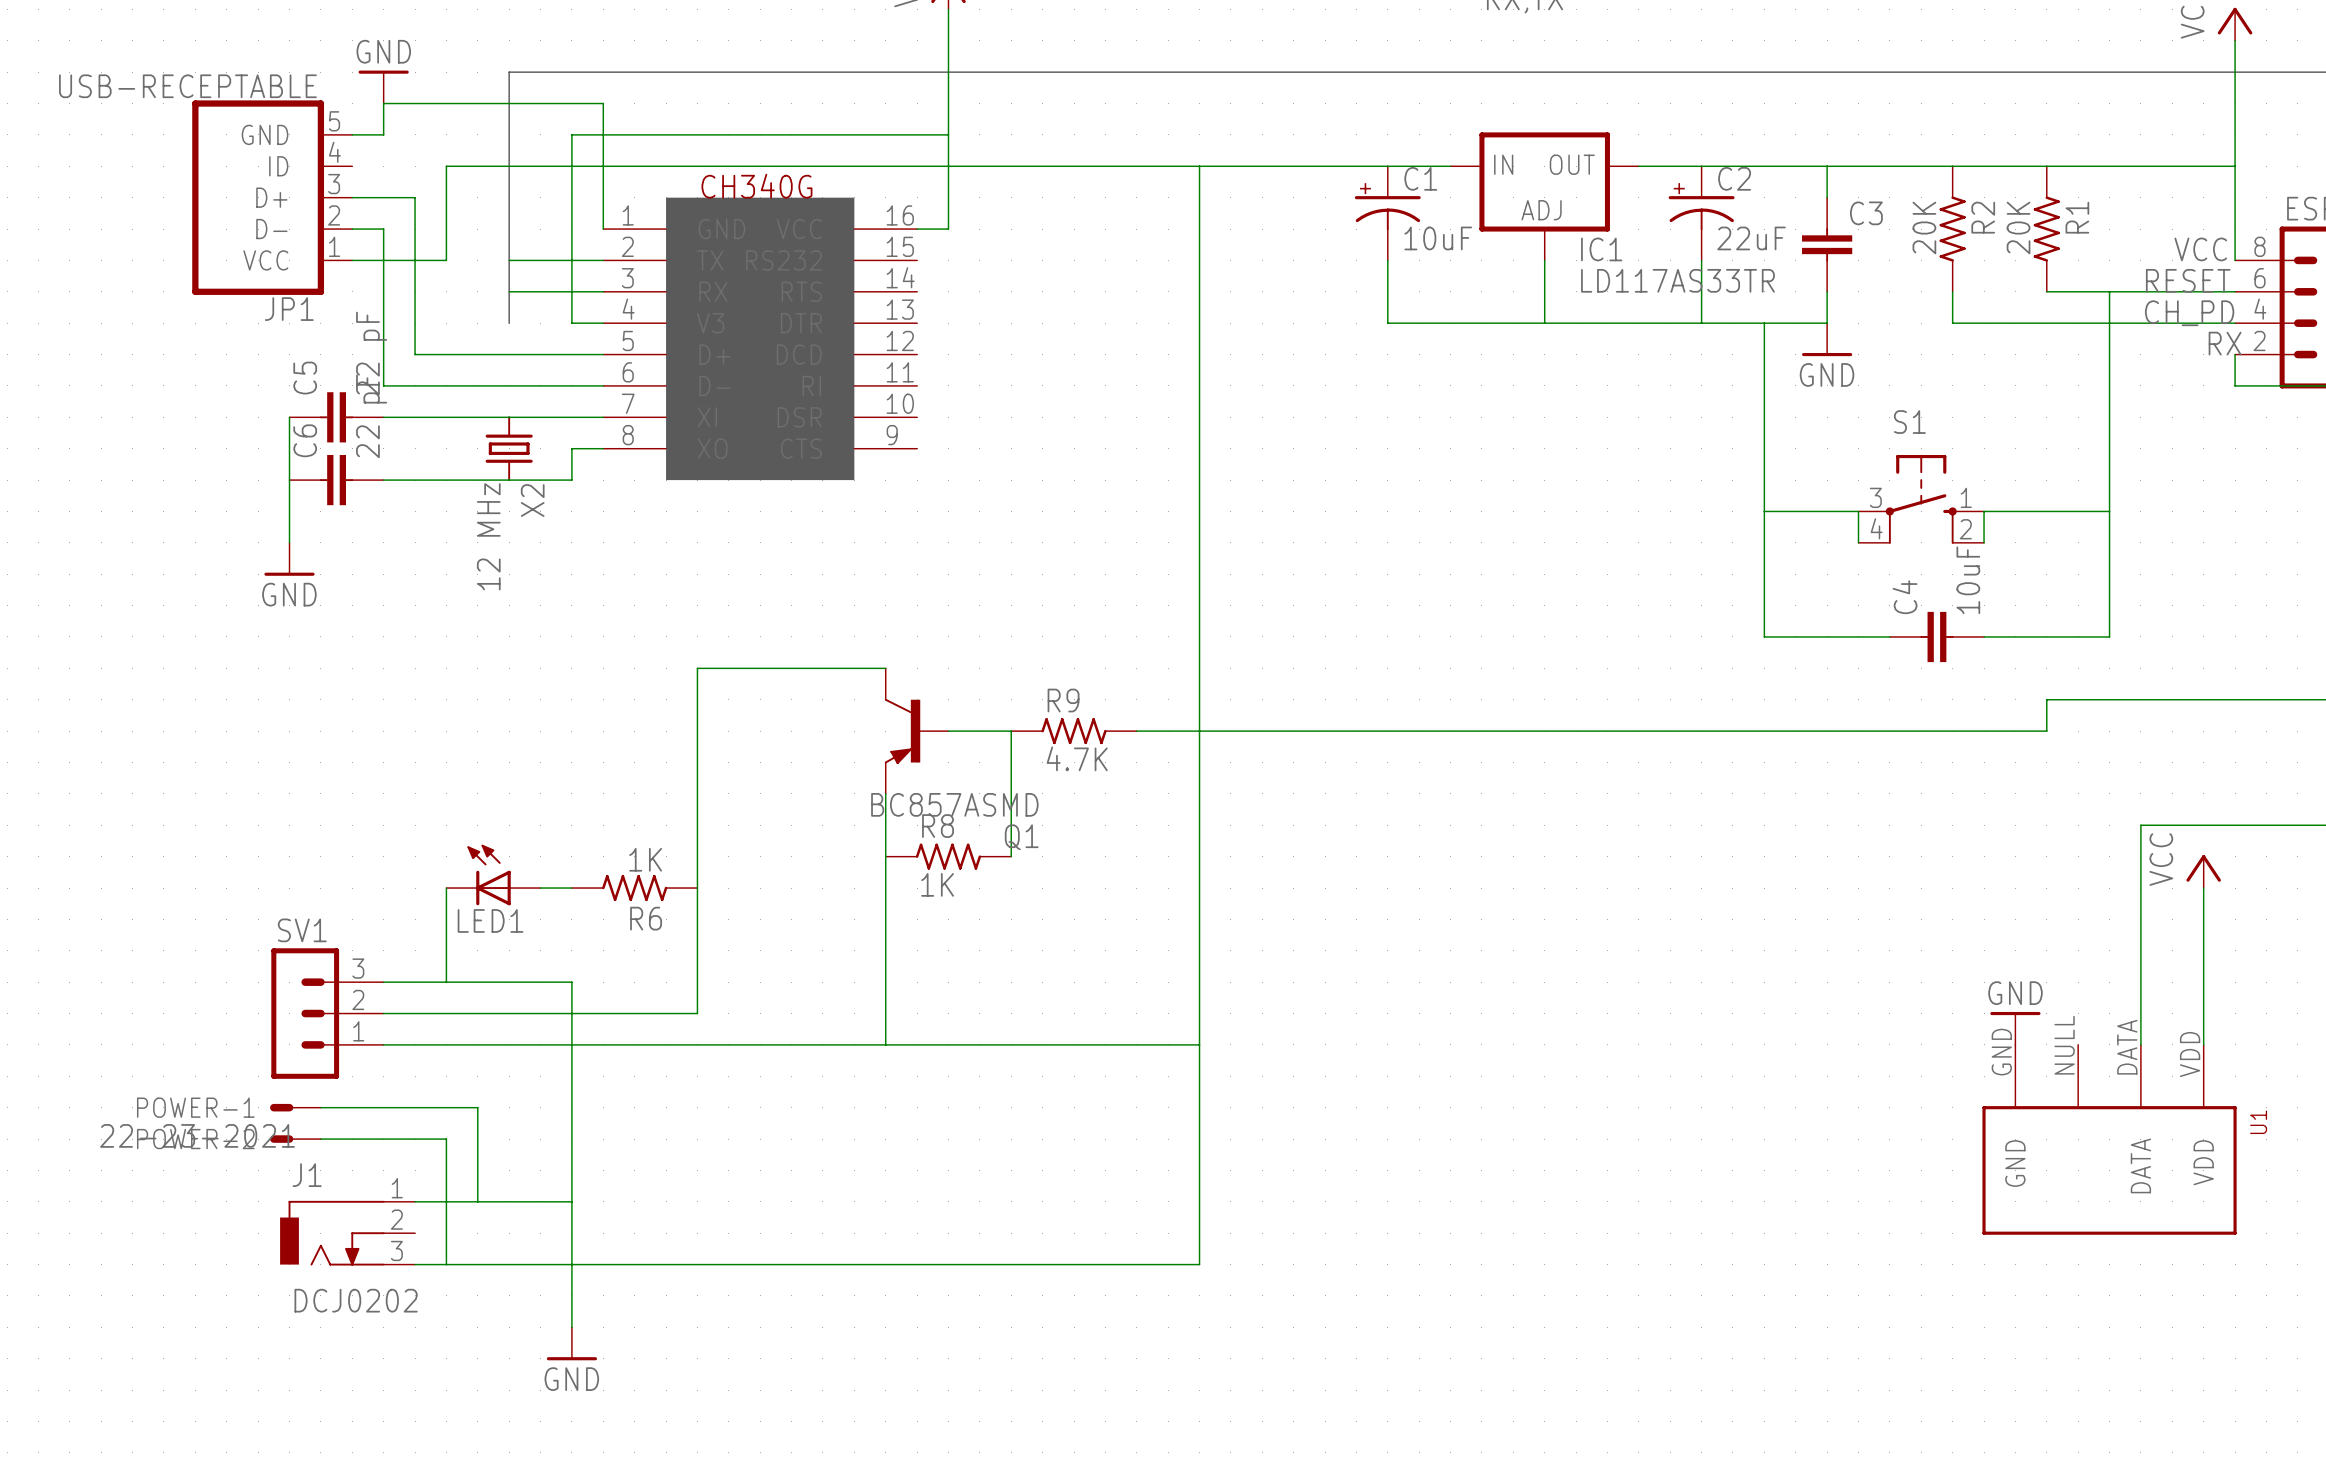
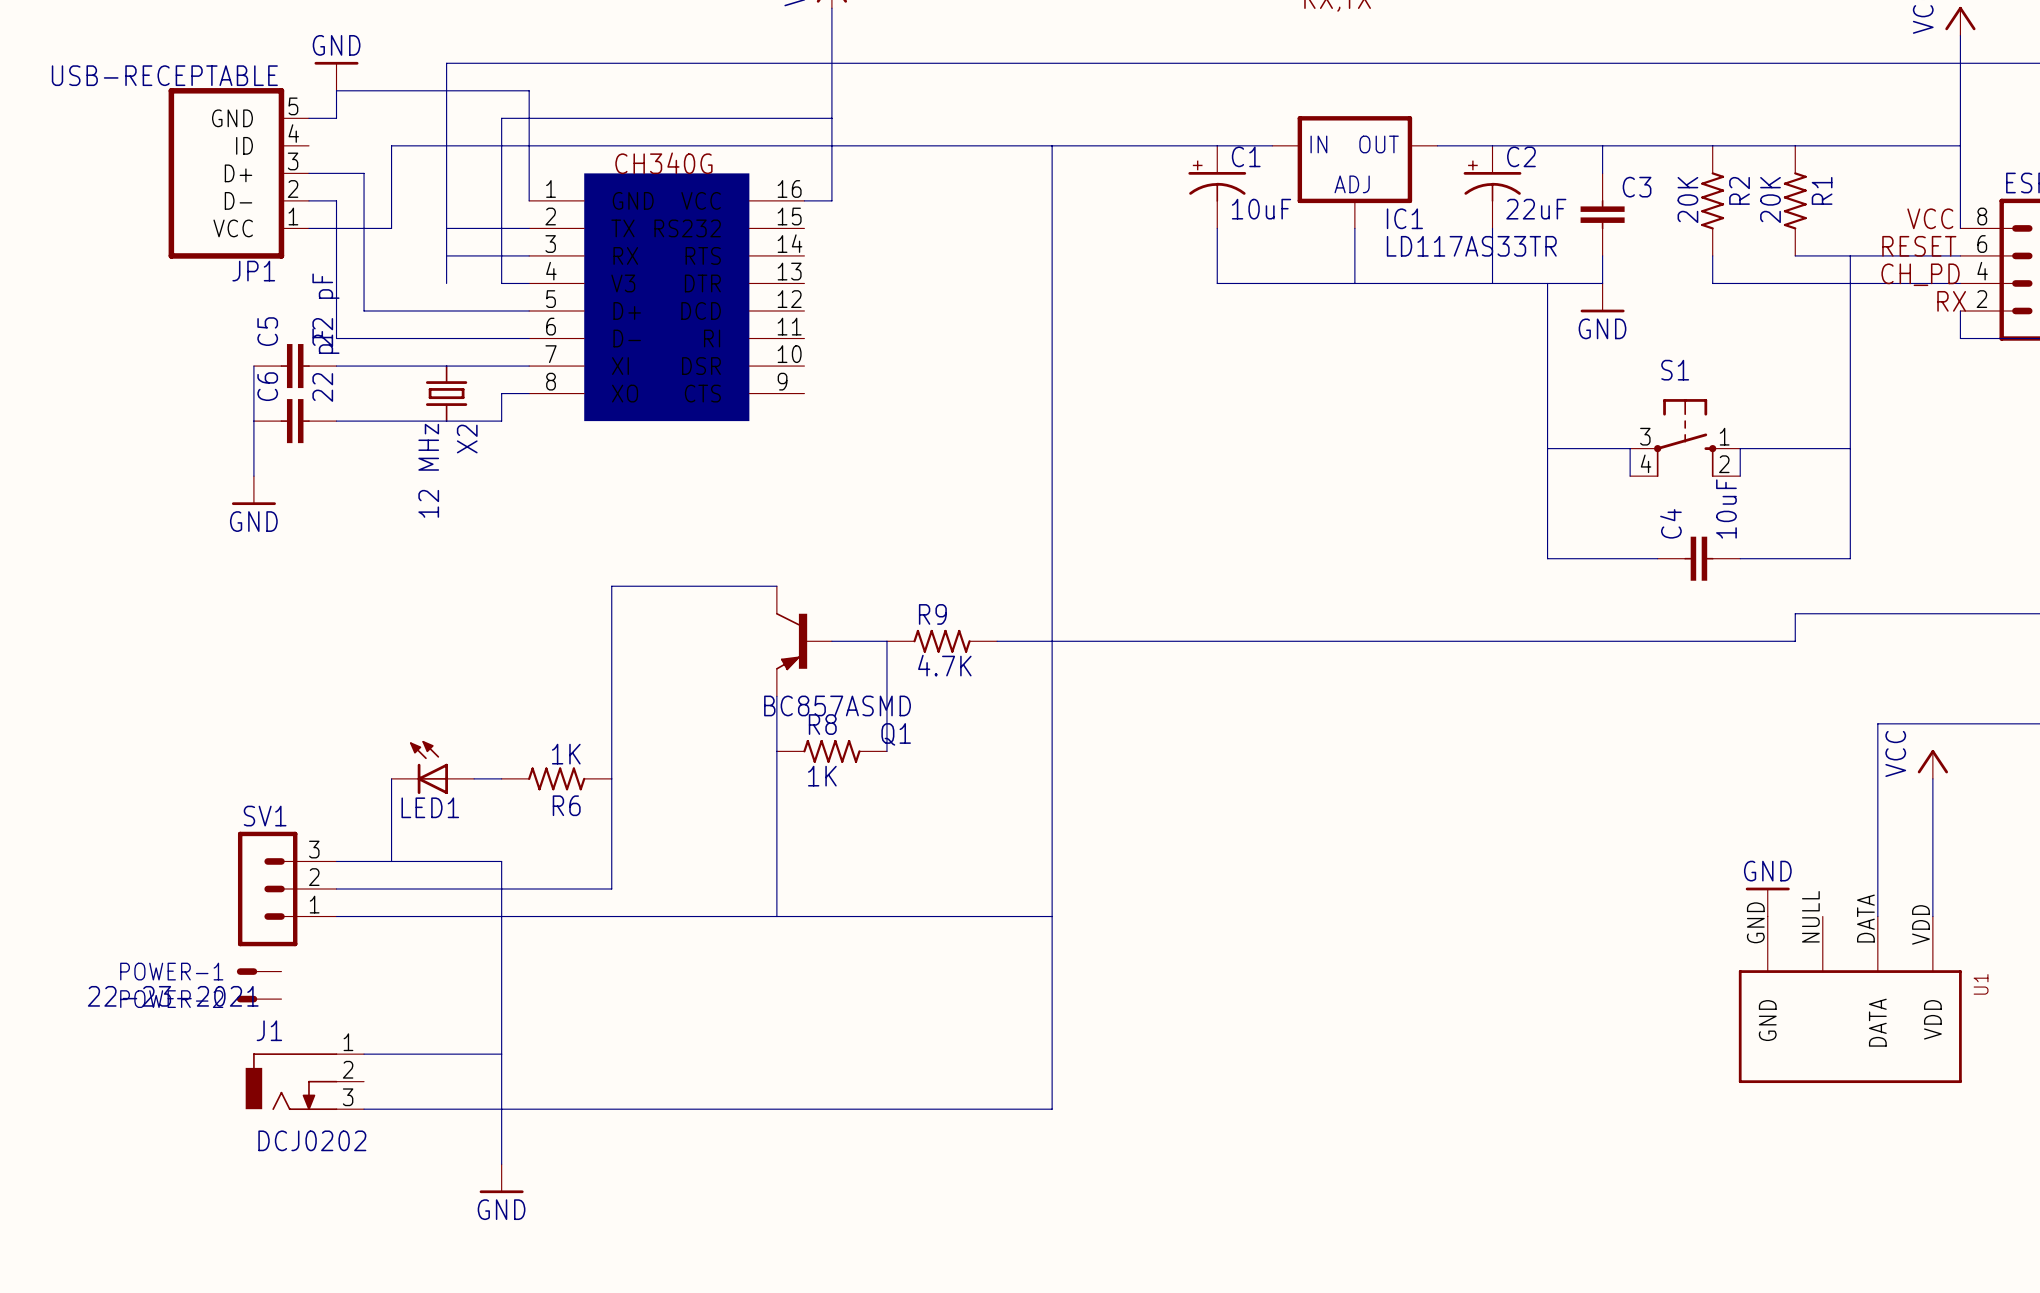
wire: (320, 1107) (477, 1107) (477, 1201) -> none
wire: (320, 1139) (446, 1139) (446, 1264) -> none

